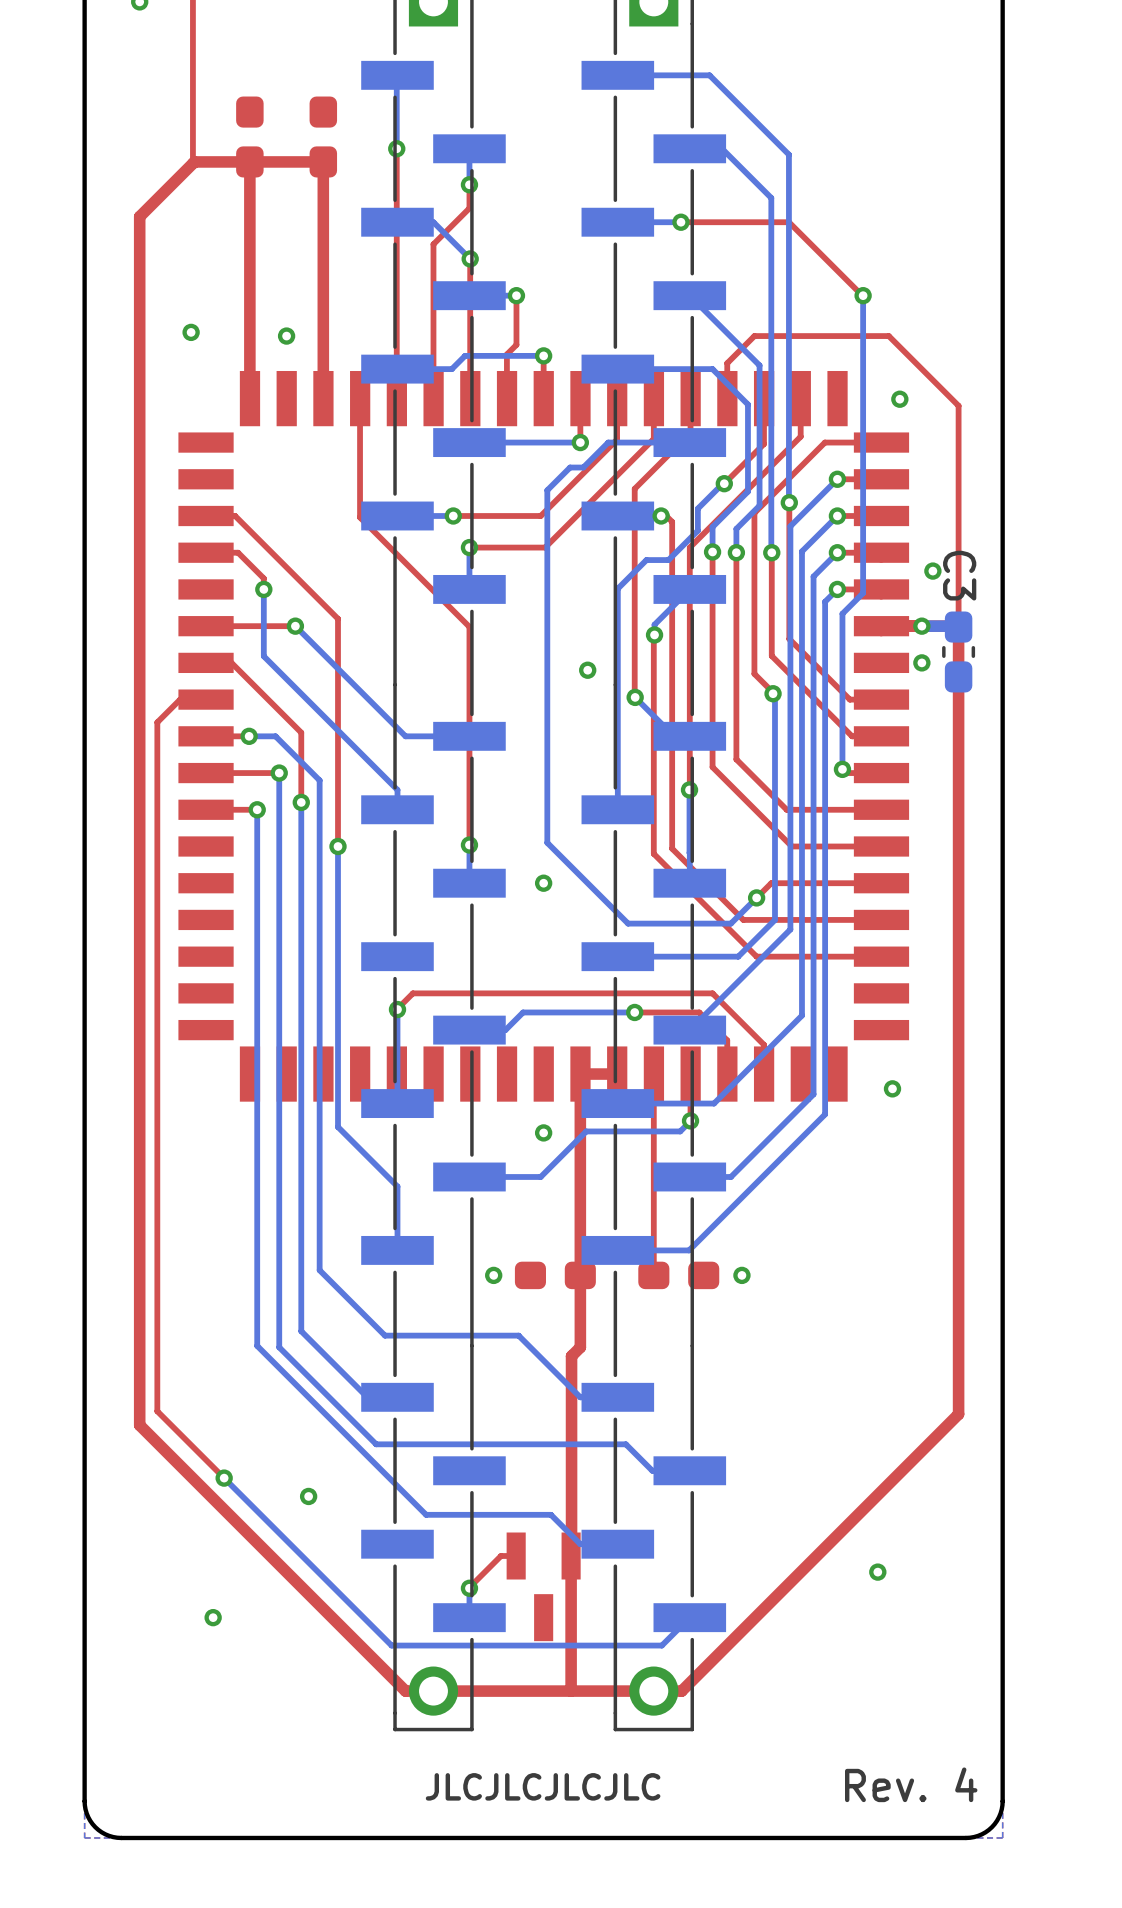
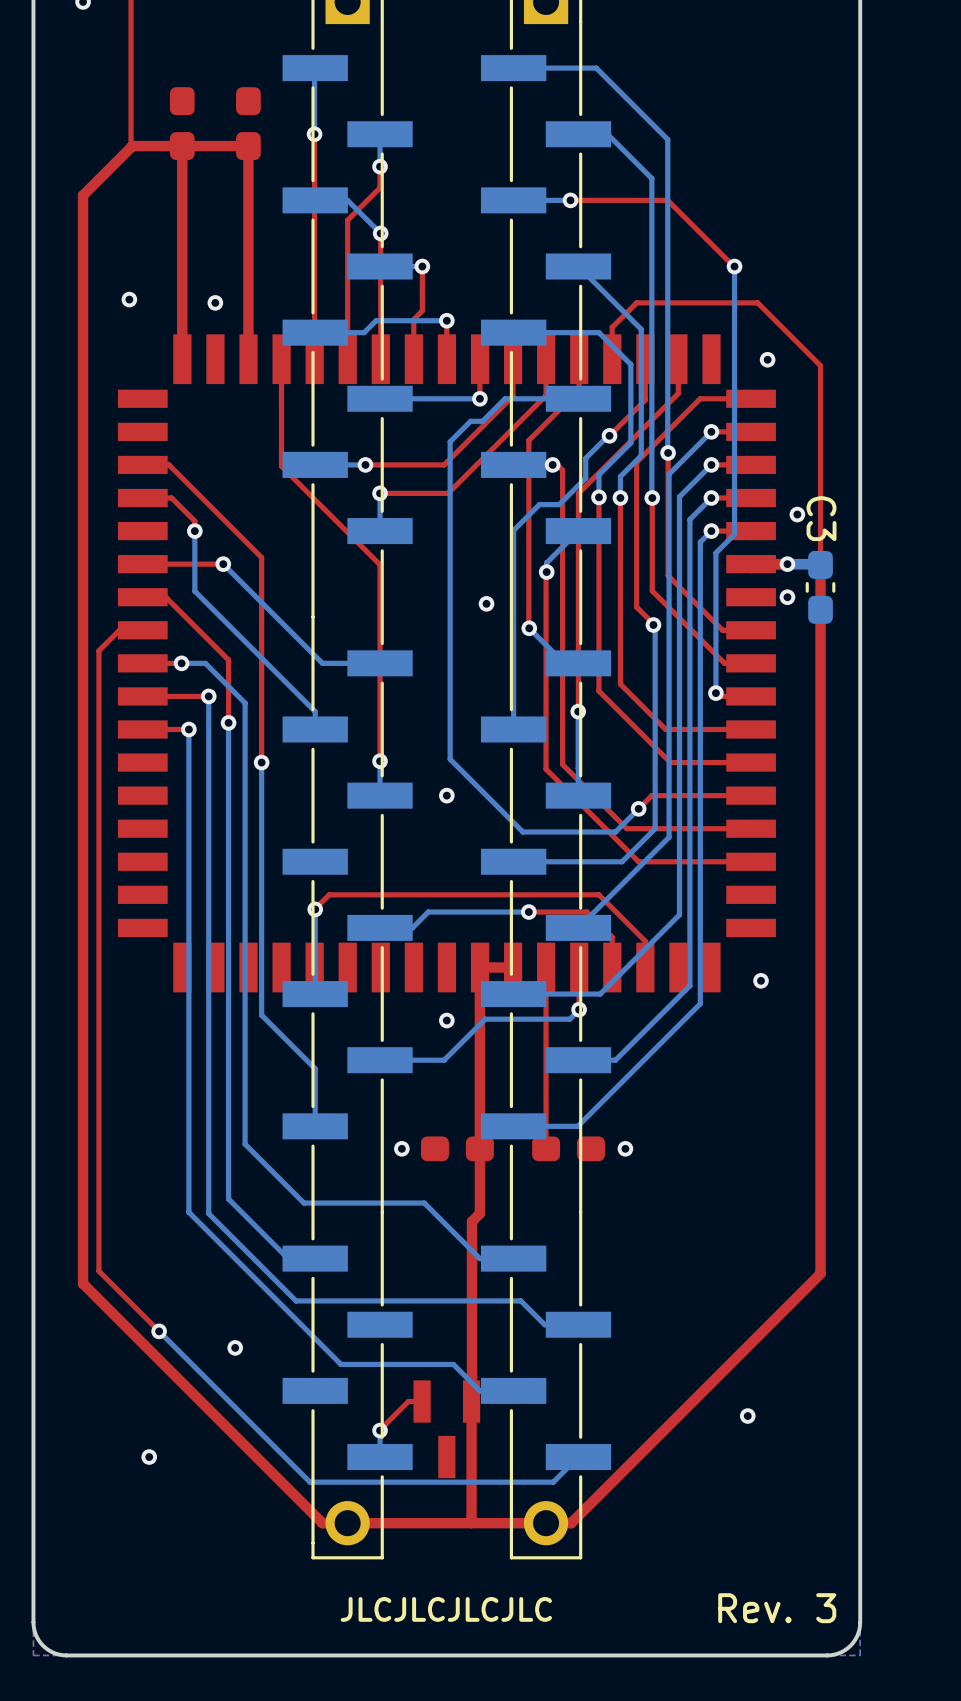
text: Rev. 4 (911, 1784) -> Rev. 3 (777, 1608)

